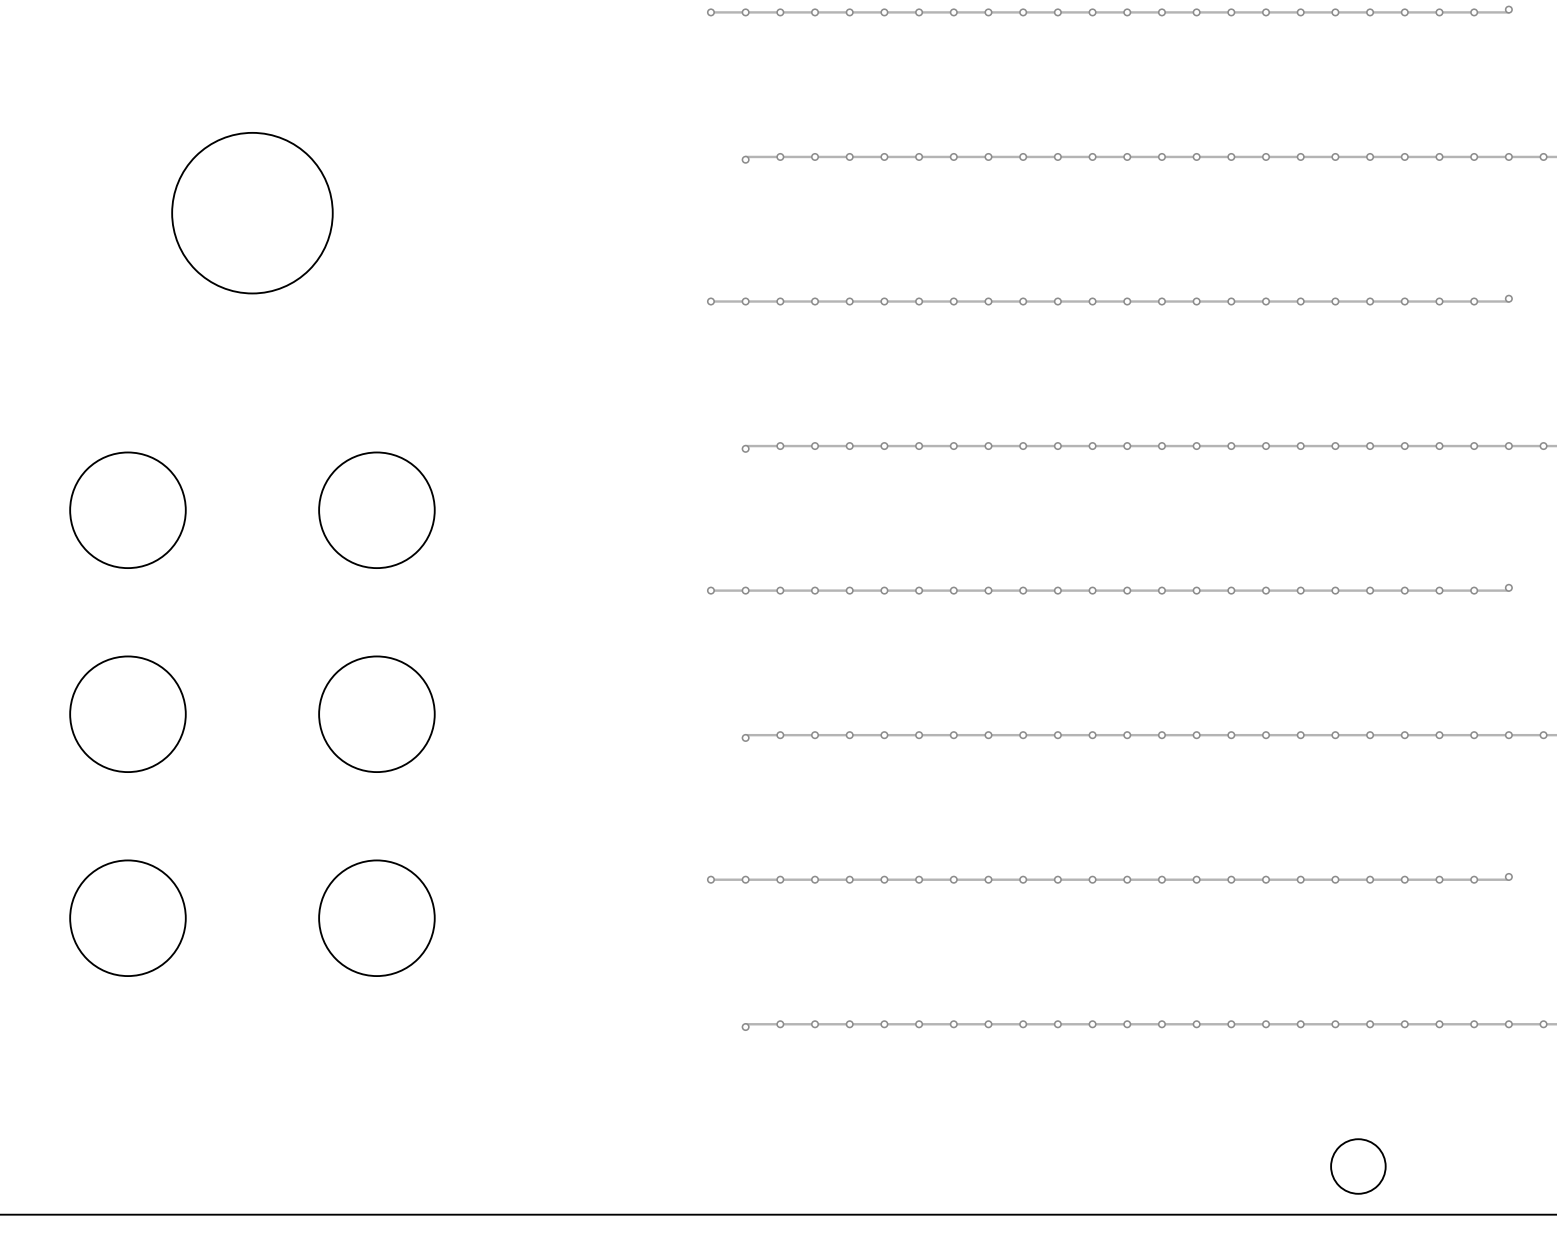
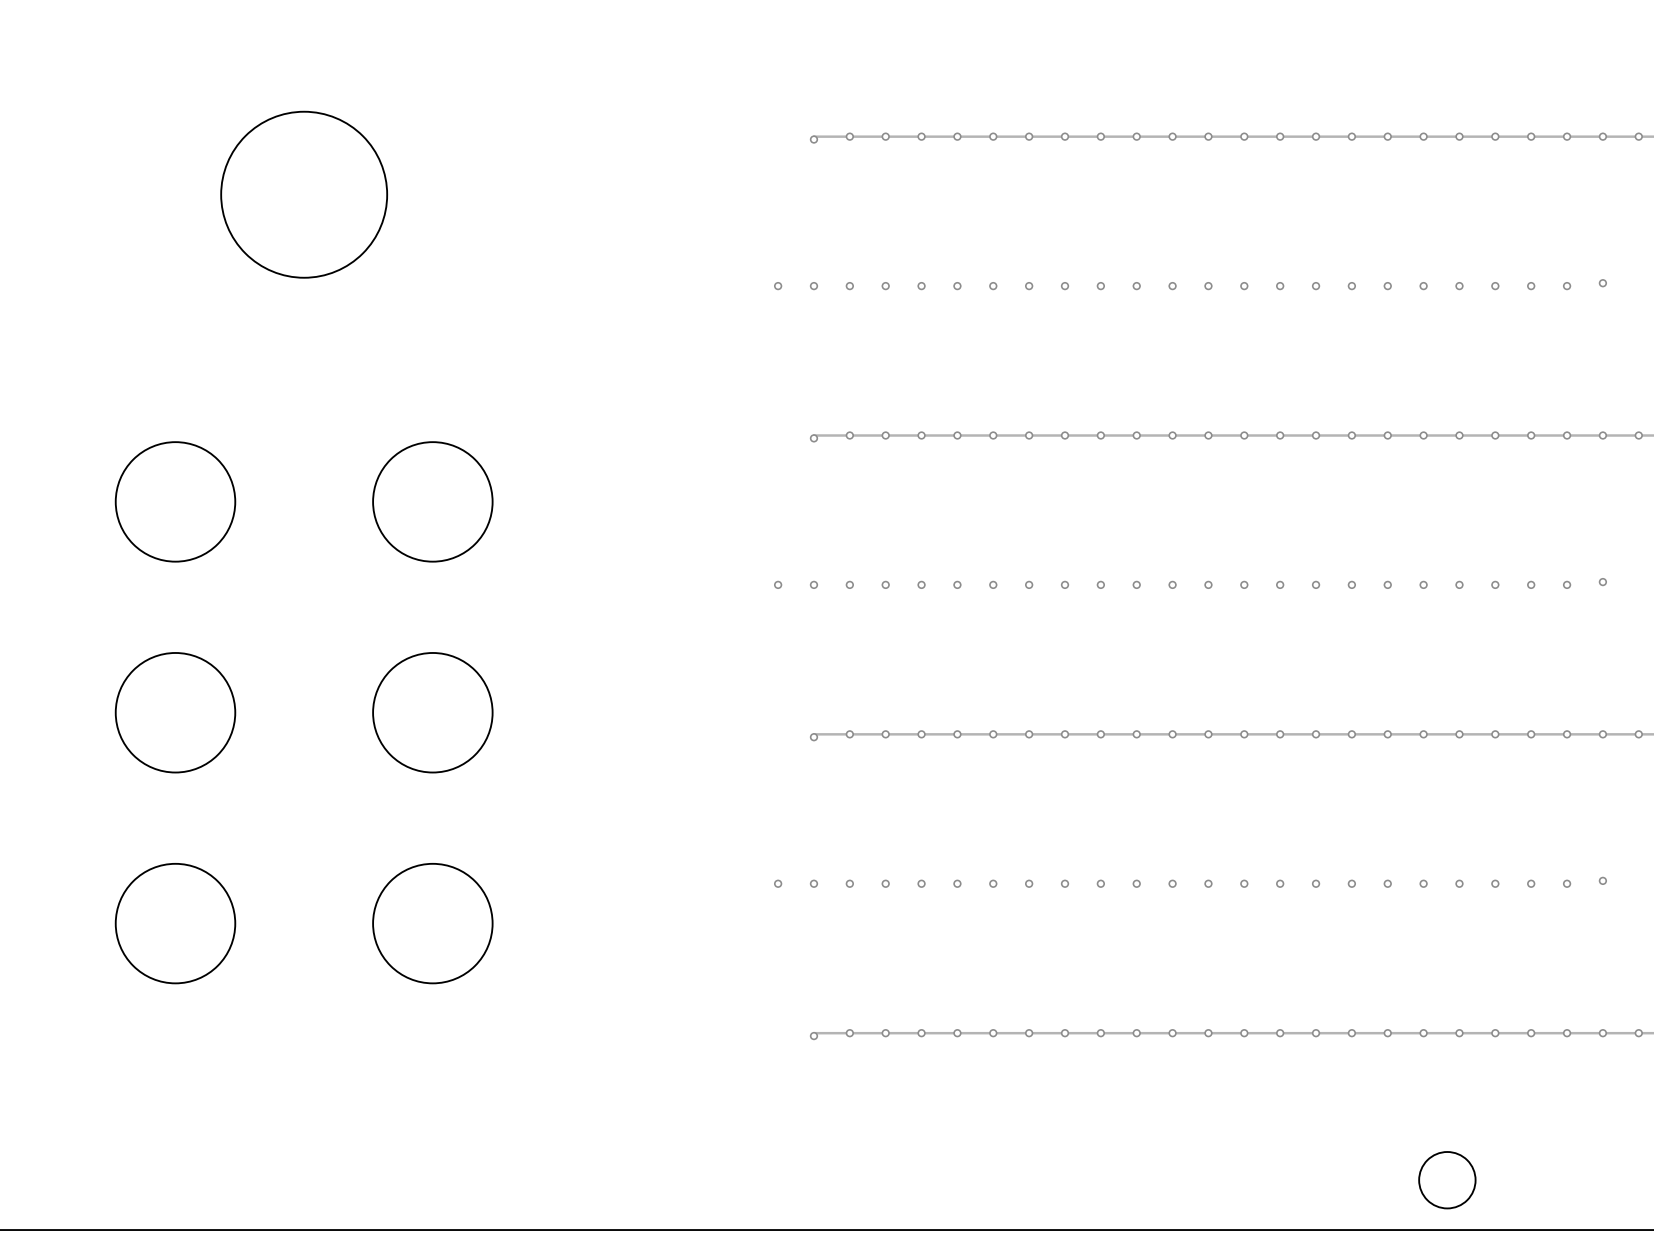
track: (710, 301) (1508, 301) -> none
track: (710, 590) (1508, 590) -> none
track: (710, 879) (1508, 879) -> none

